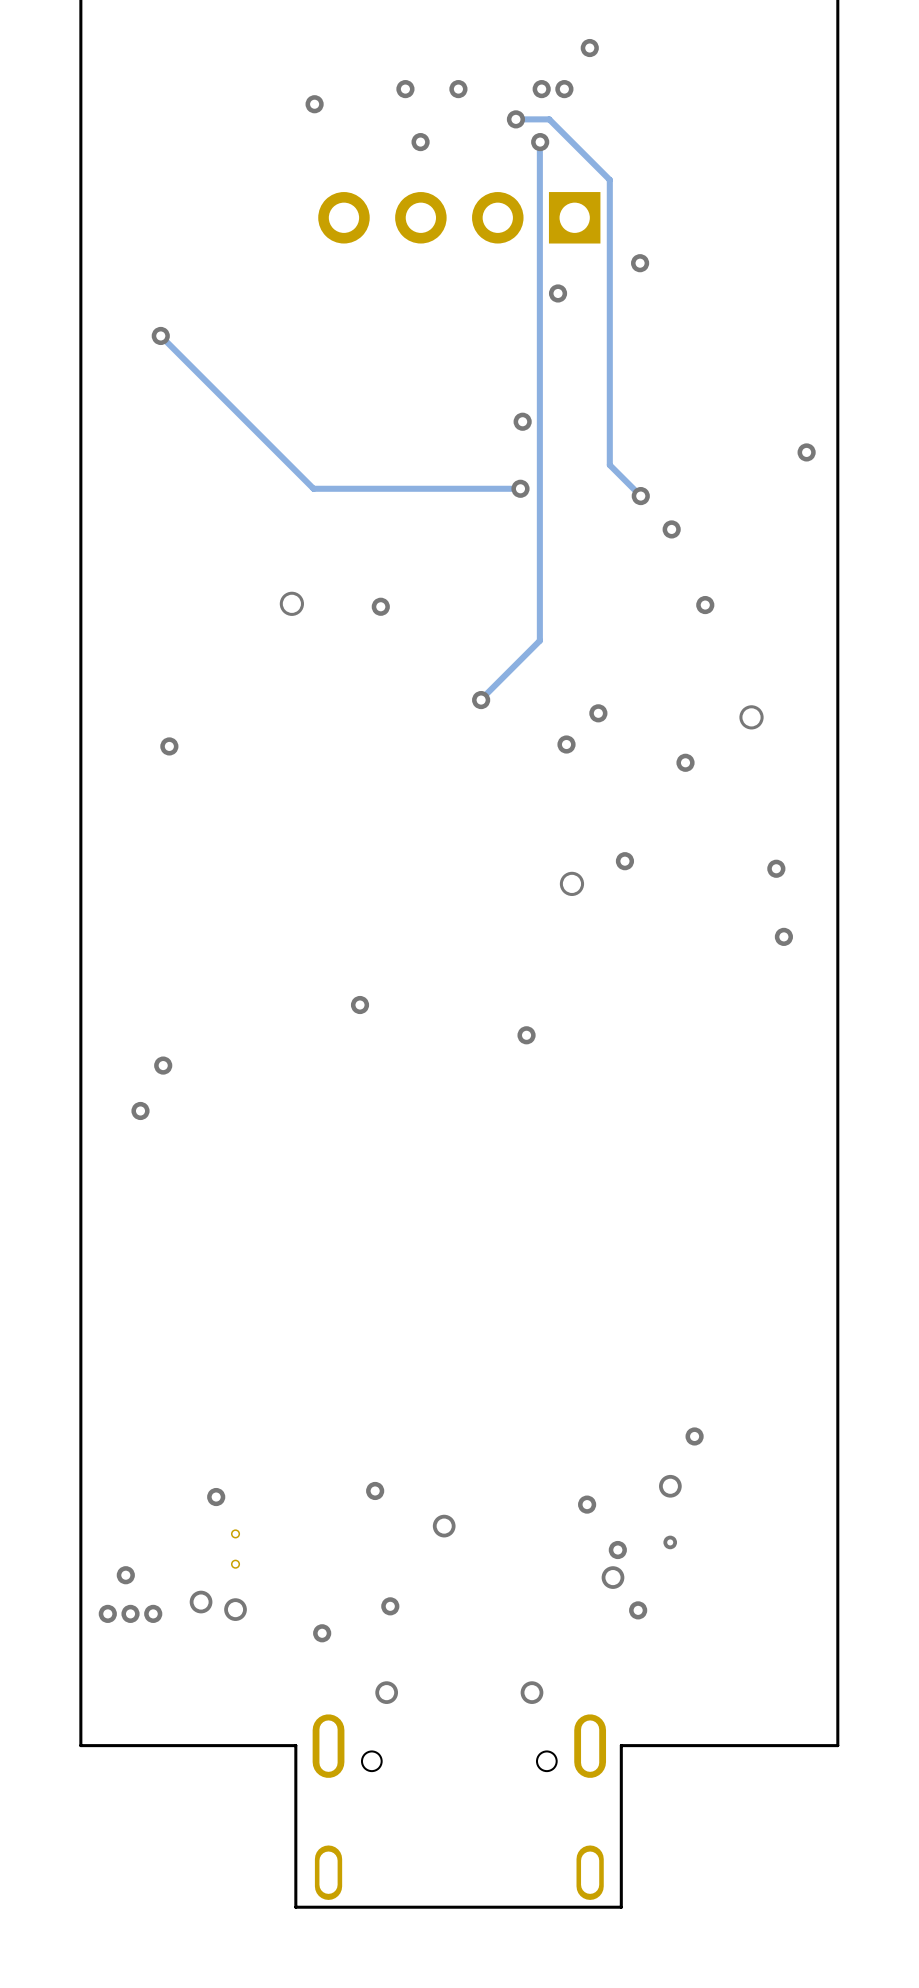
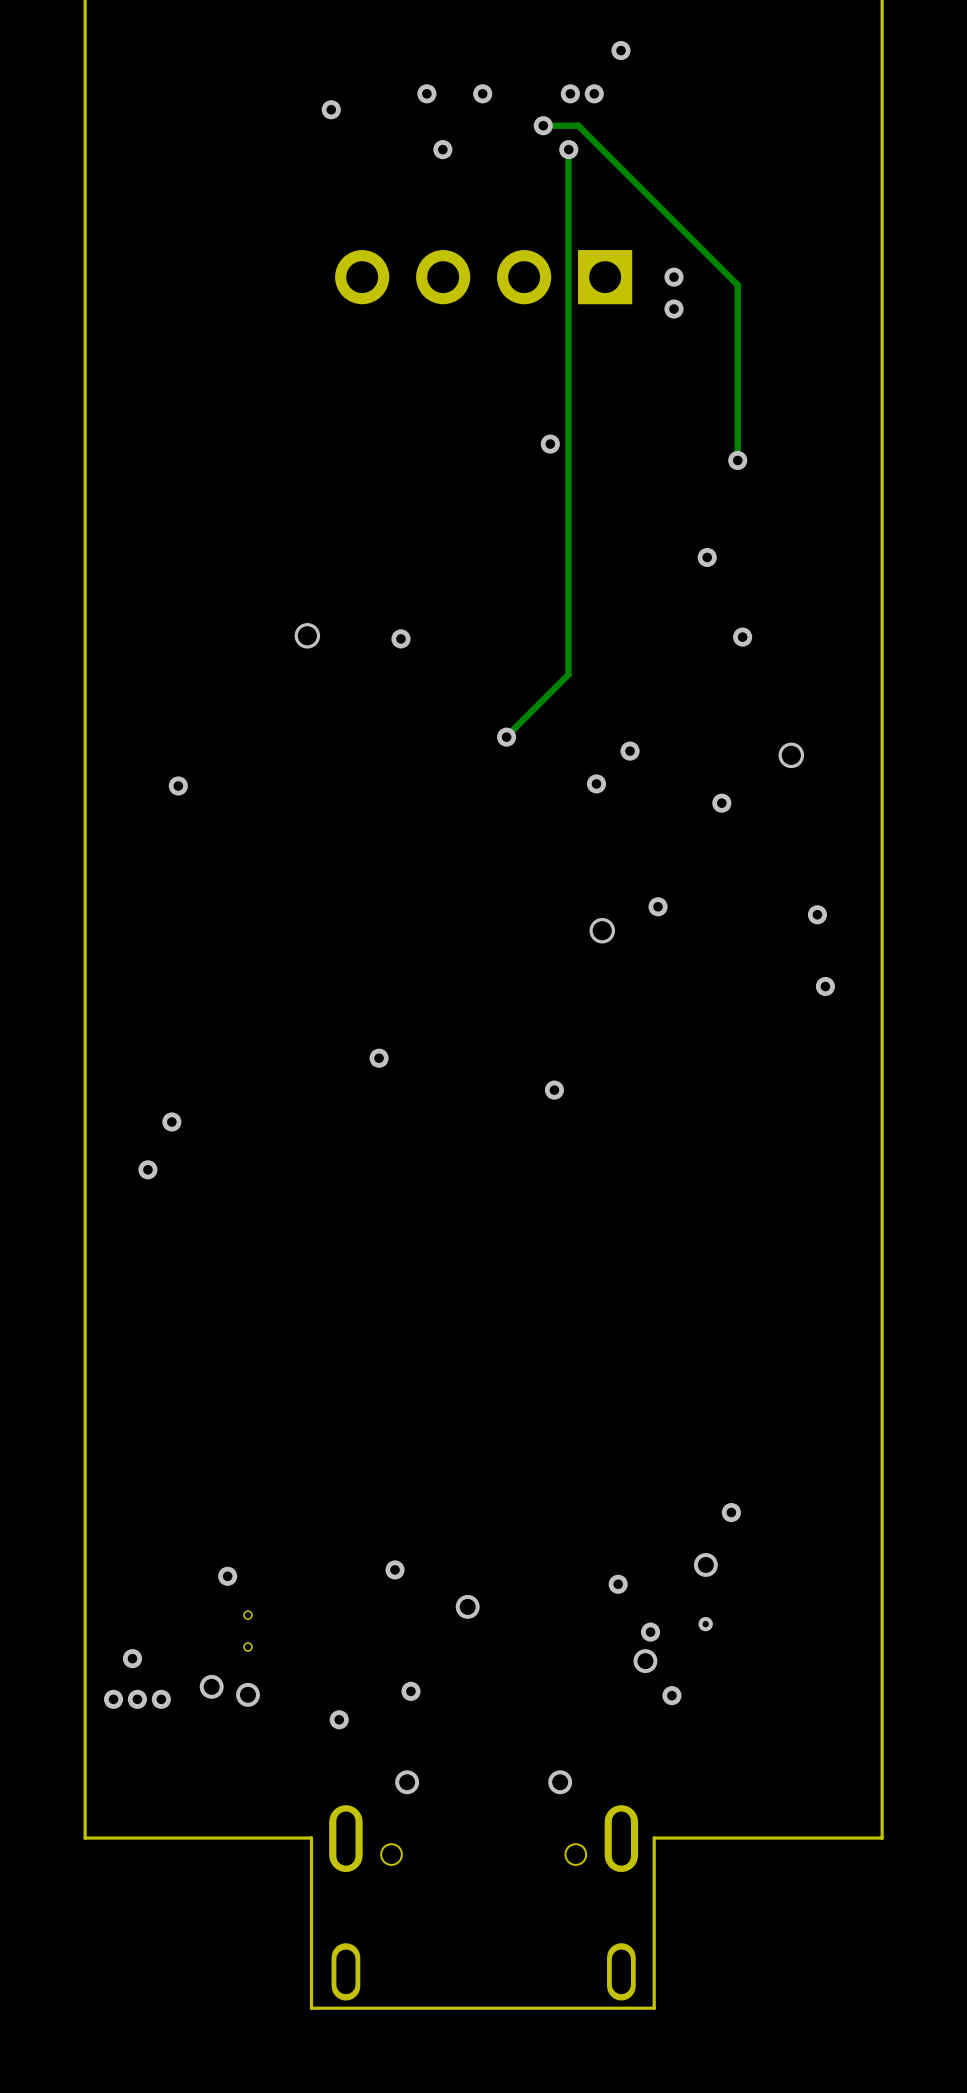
track: (609, 179) (609, 465) (640, 496) -> (642, 189) (737, 285) (737, 460)
part position: (459, 217) -> (483, 277)
via position: (558, 293) -> (673, 309)
track: (160, 335) (313, 488) (520, 488) -> none
via: (160, 335) -> none
via: none -> (737, 460)
via: (806, 452) -> none
via: (520, 488) -> none
via: (640, 496) -> none

